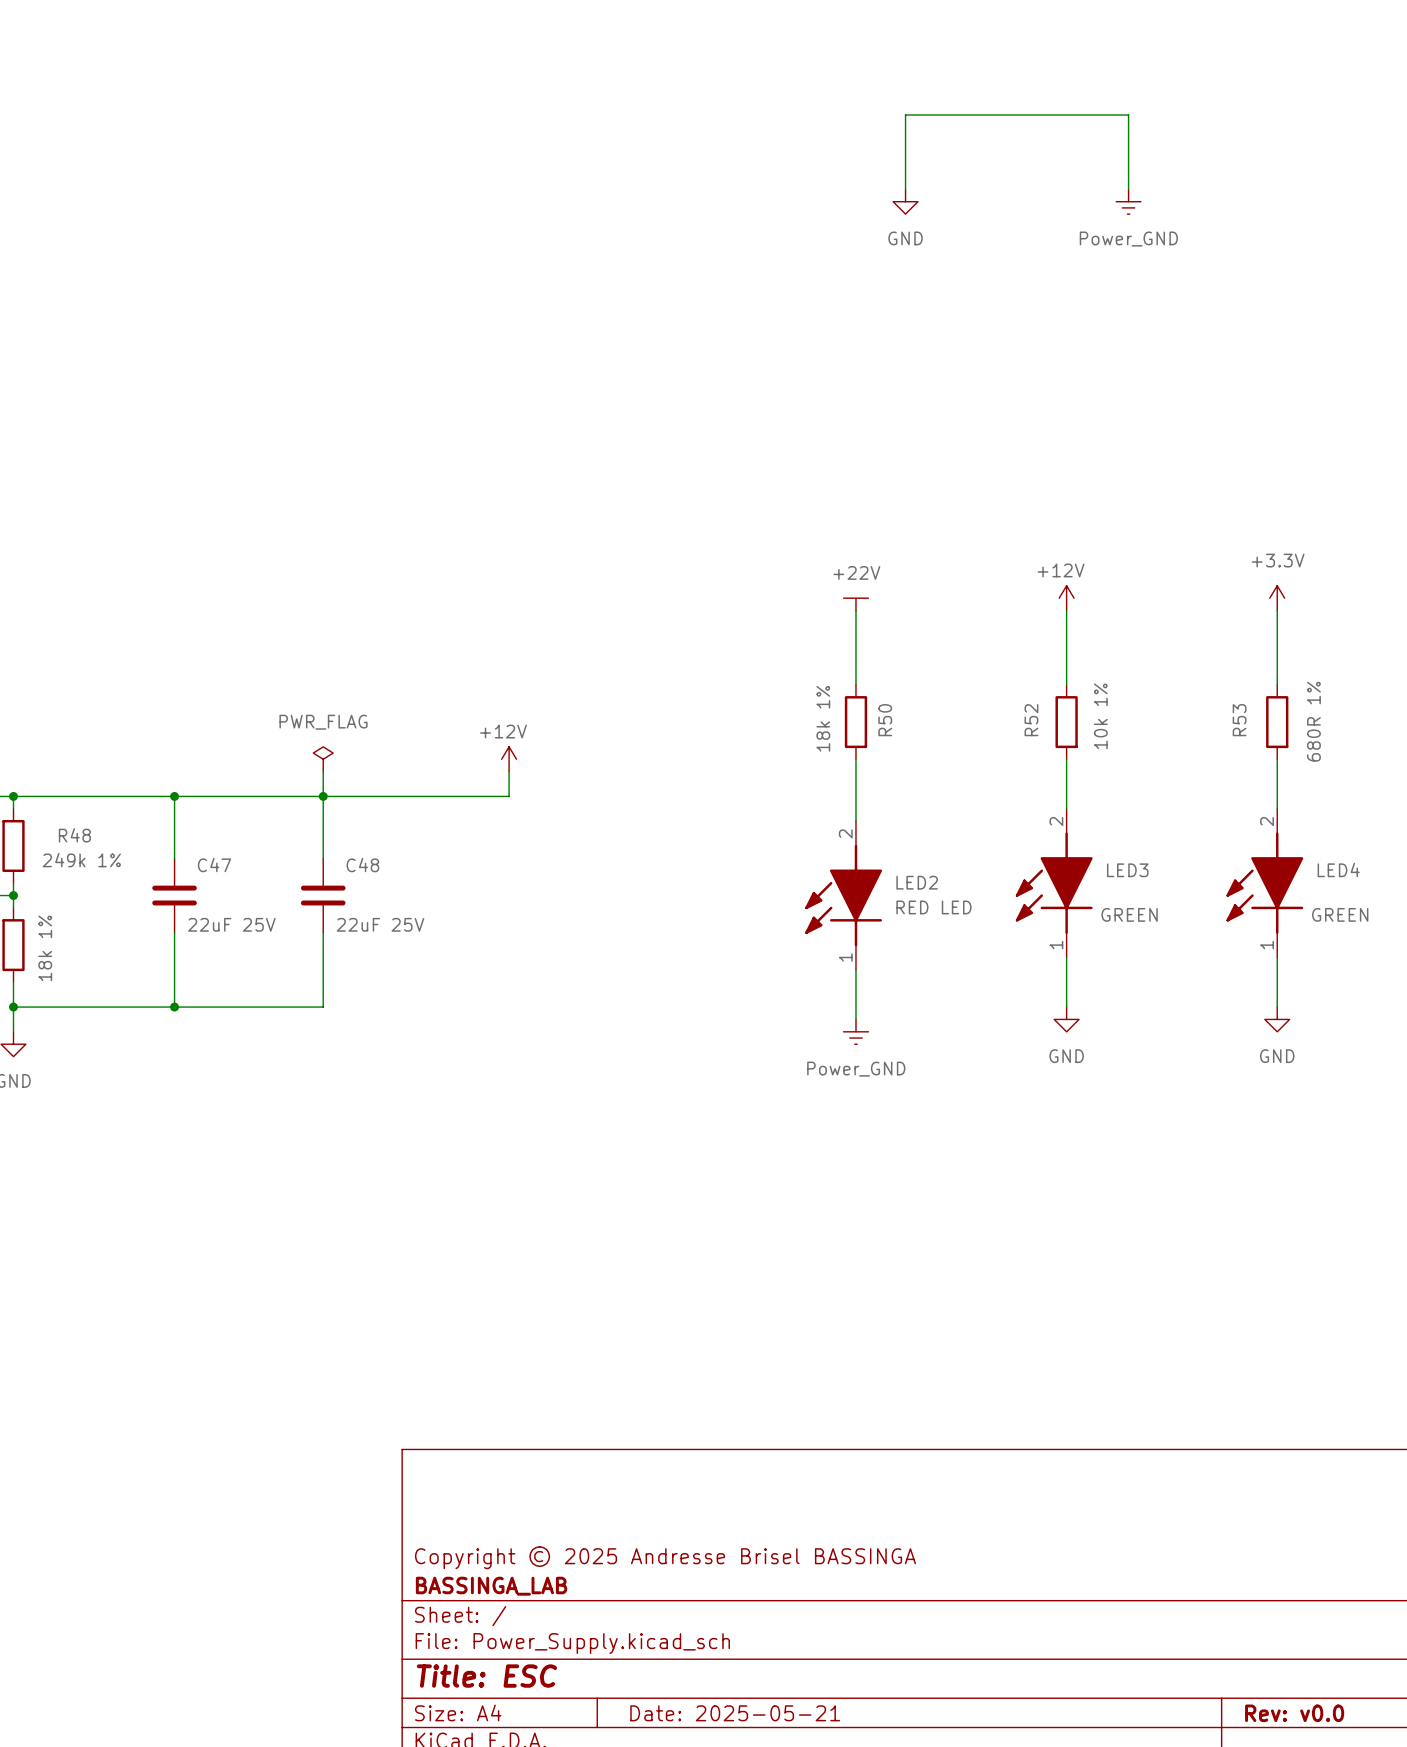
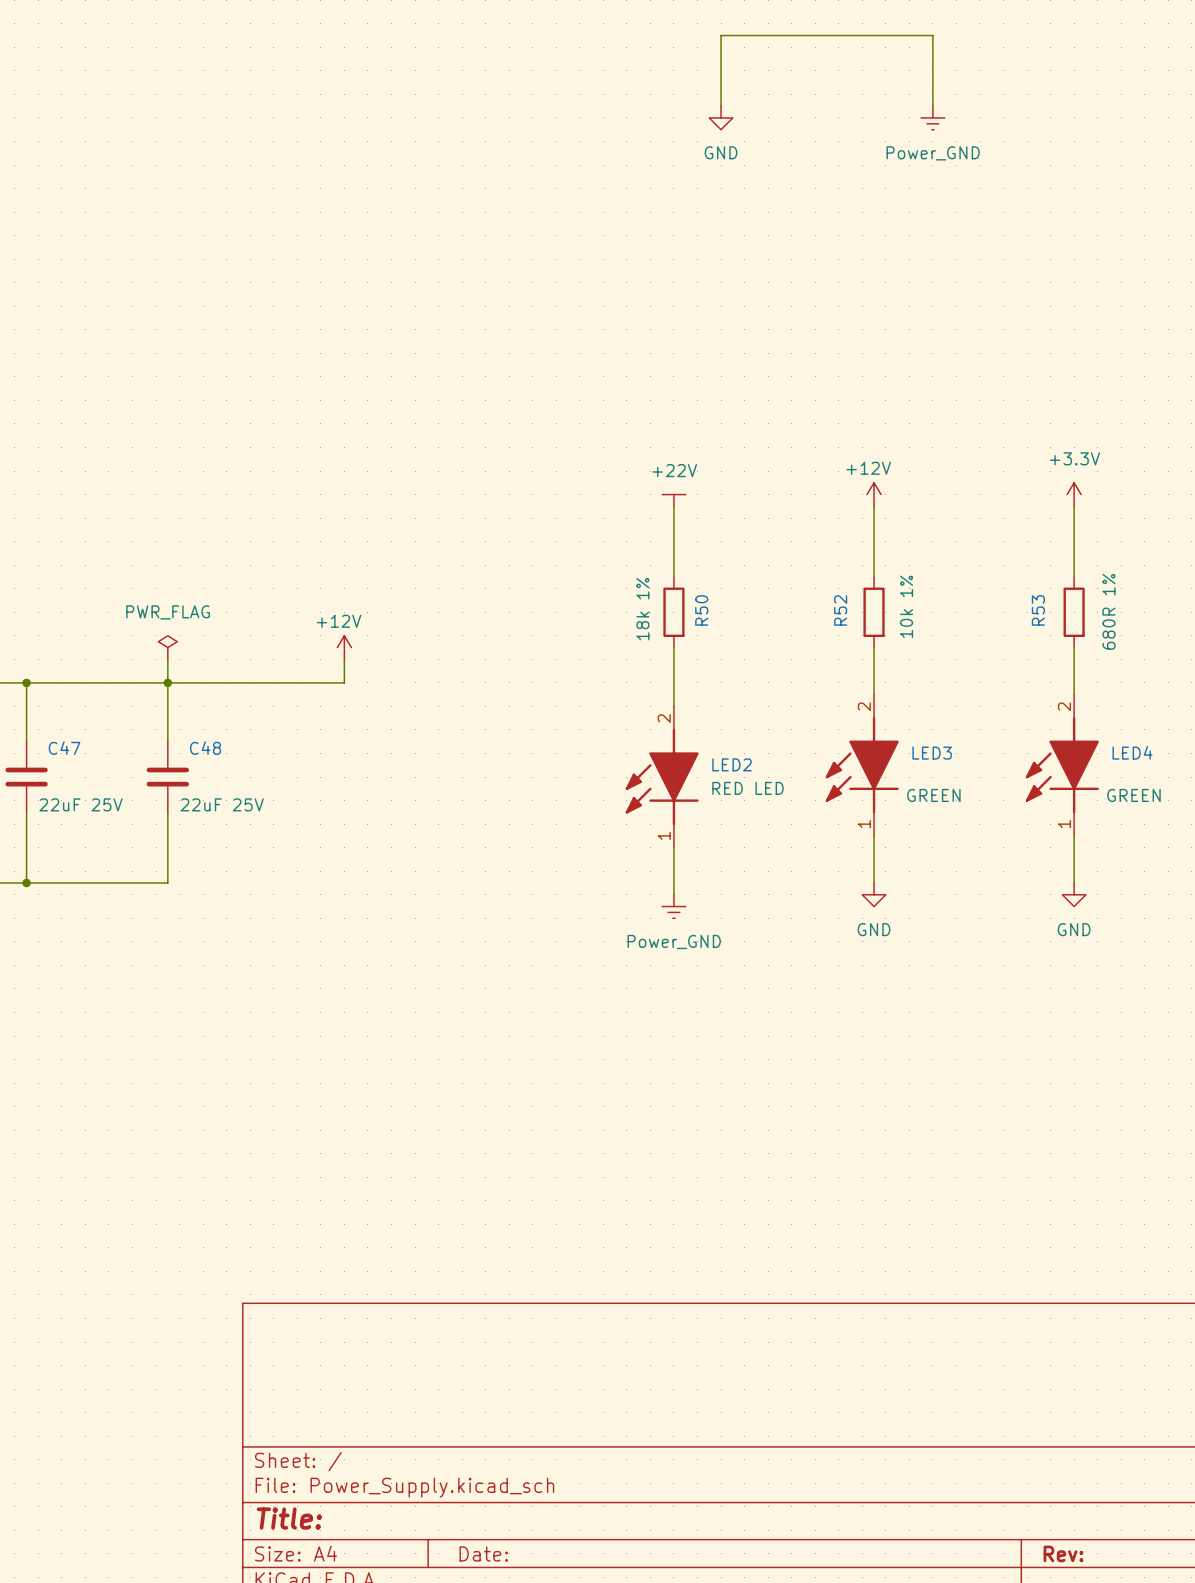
title block: Copyright © 2025 Andresse Brisel BASSINGA (665, 1557) -> none
title block: BASSINGA_LAB (491, 1586) -> none
title block: Title: ESC (486, 1676) -> Title: (289, 1518)
title block: Date: 2025-05-21 (735, 1713) -> Date: (483, 1553)
title block: Rev: v0.0 (1294, 1713) -> Rev: (1063, 1553)

